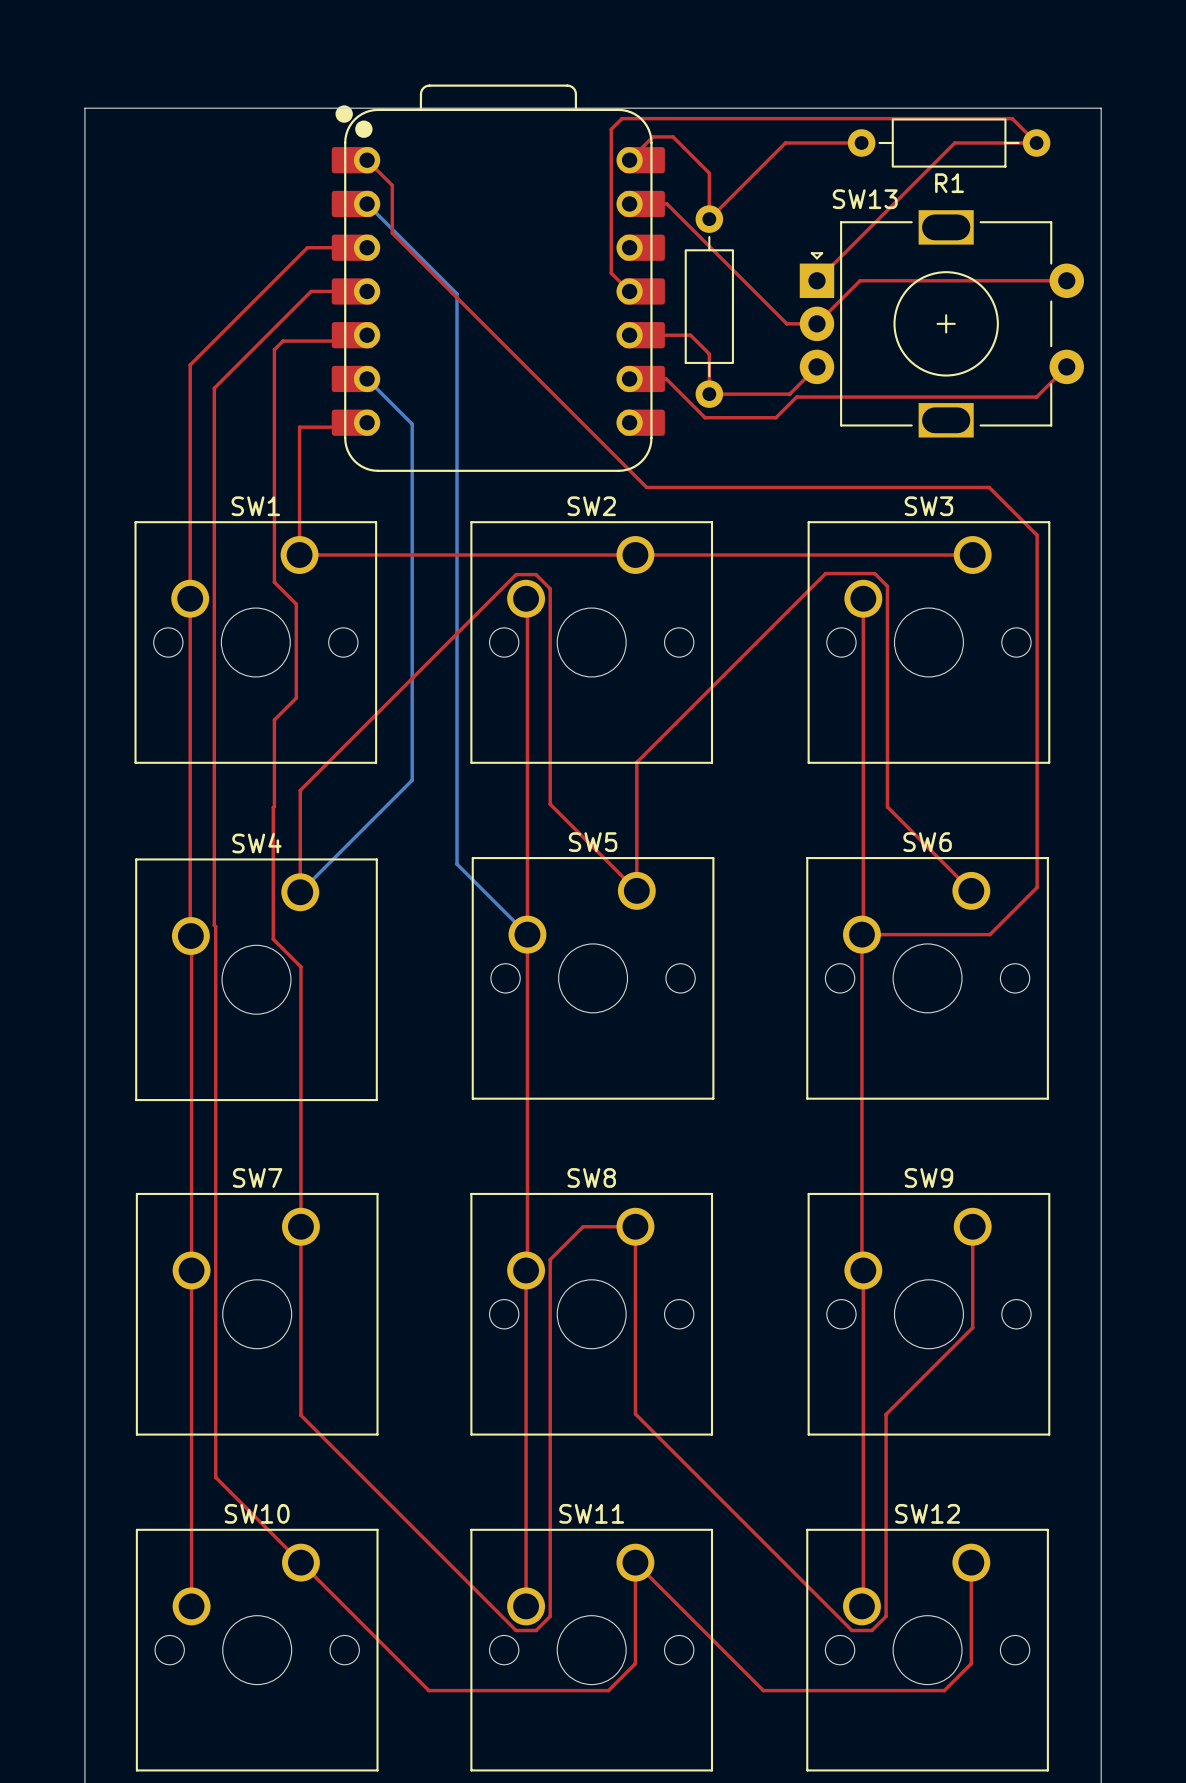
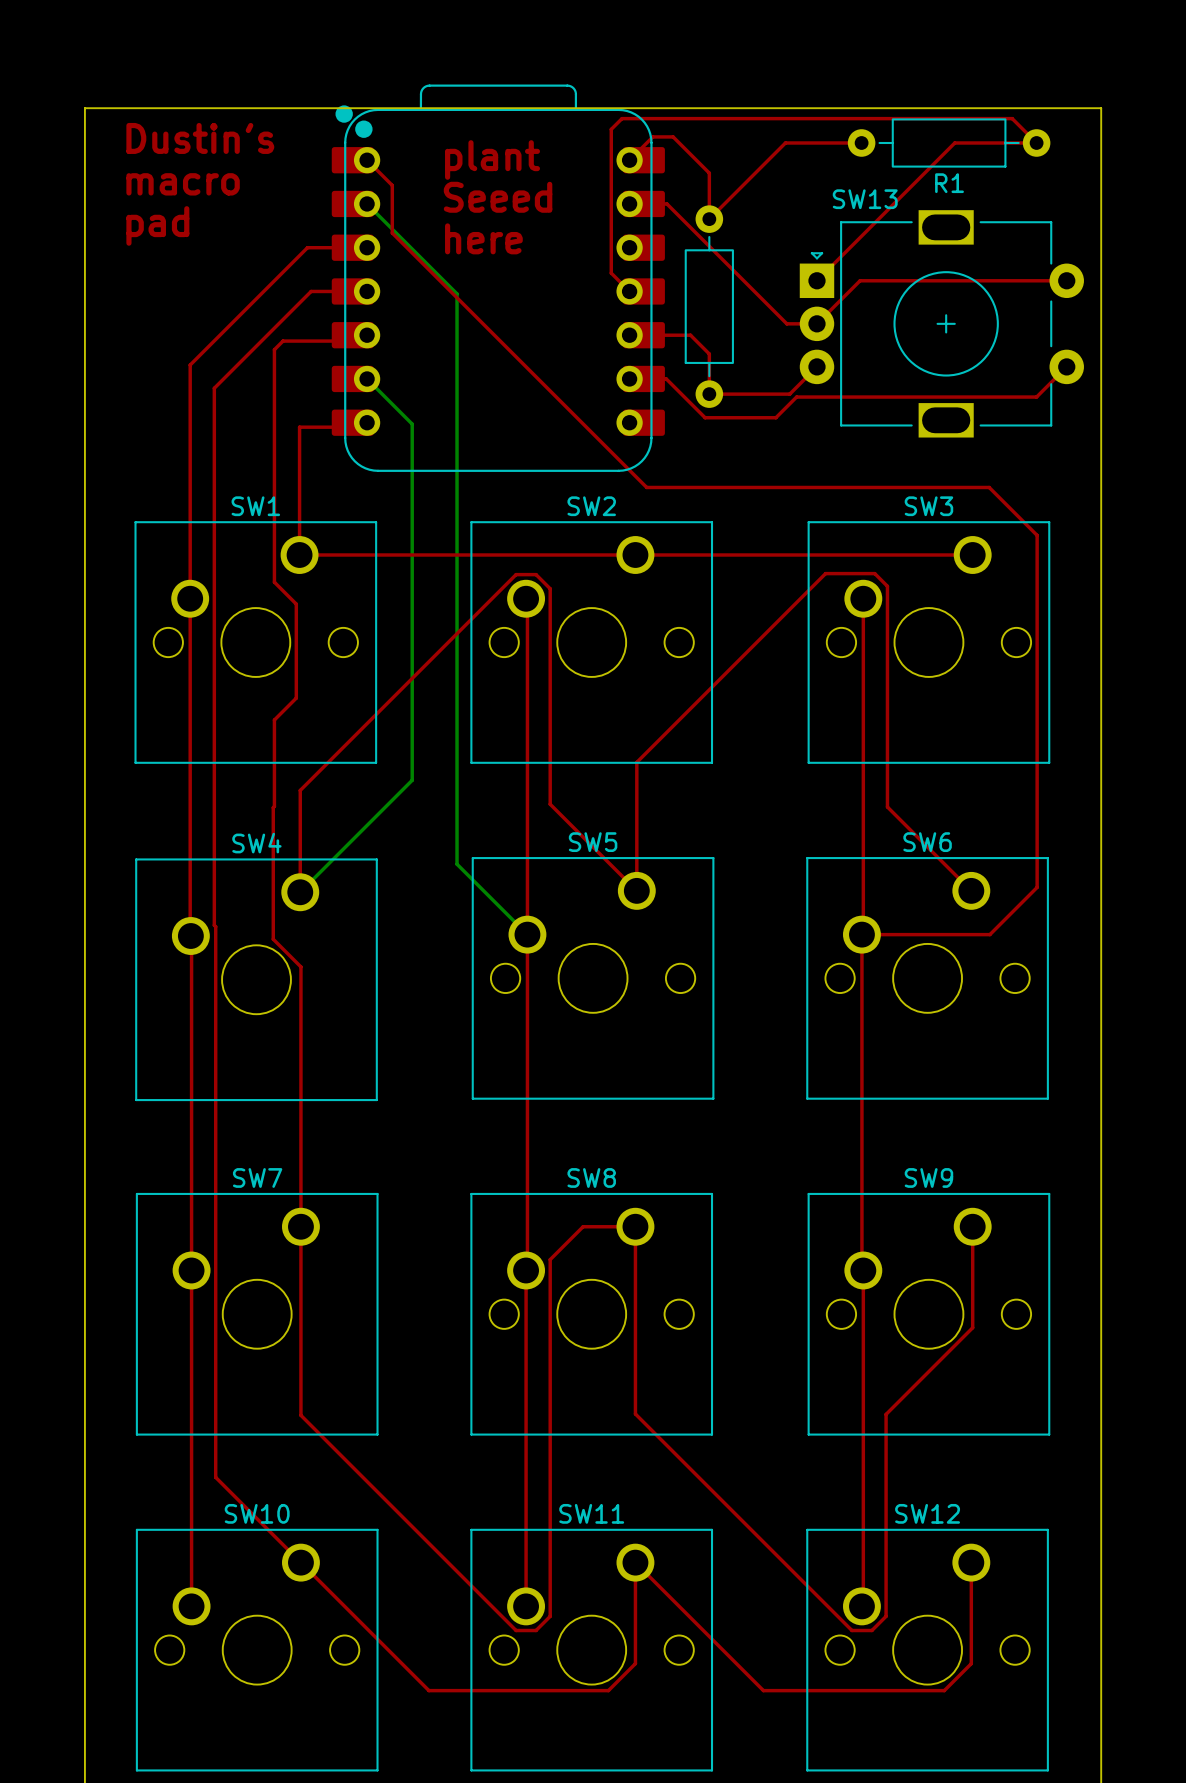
text: none -> Dustin's (200, 138)
text: none -> plant (492, 159)
text: none -> macro (183, 184)
text: none -> Seeed (498, 197)
text: none -> pad (157, 225)
text: none -> here (483, 238)

